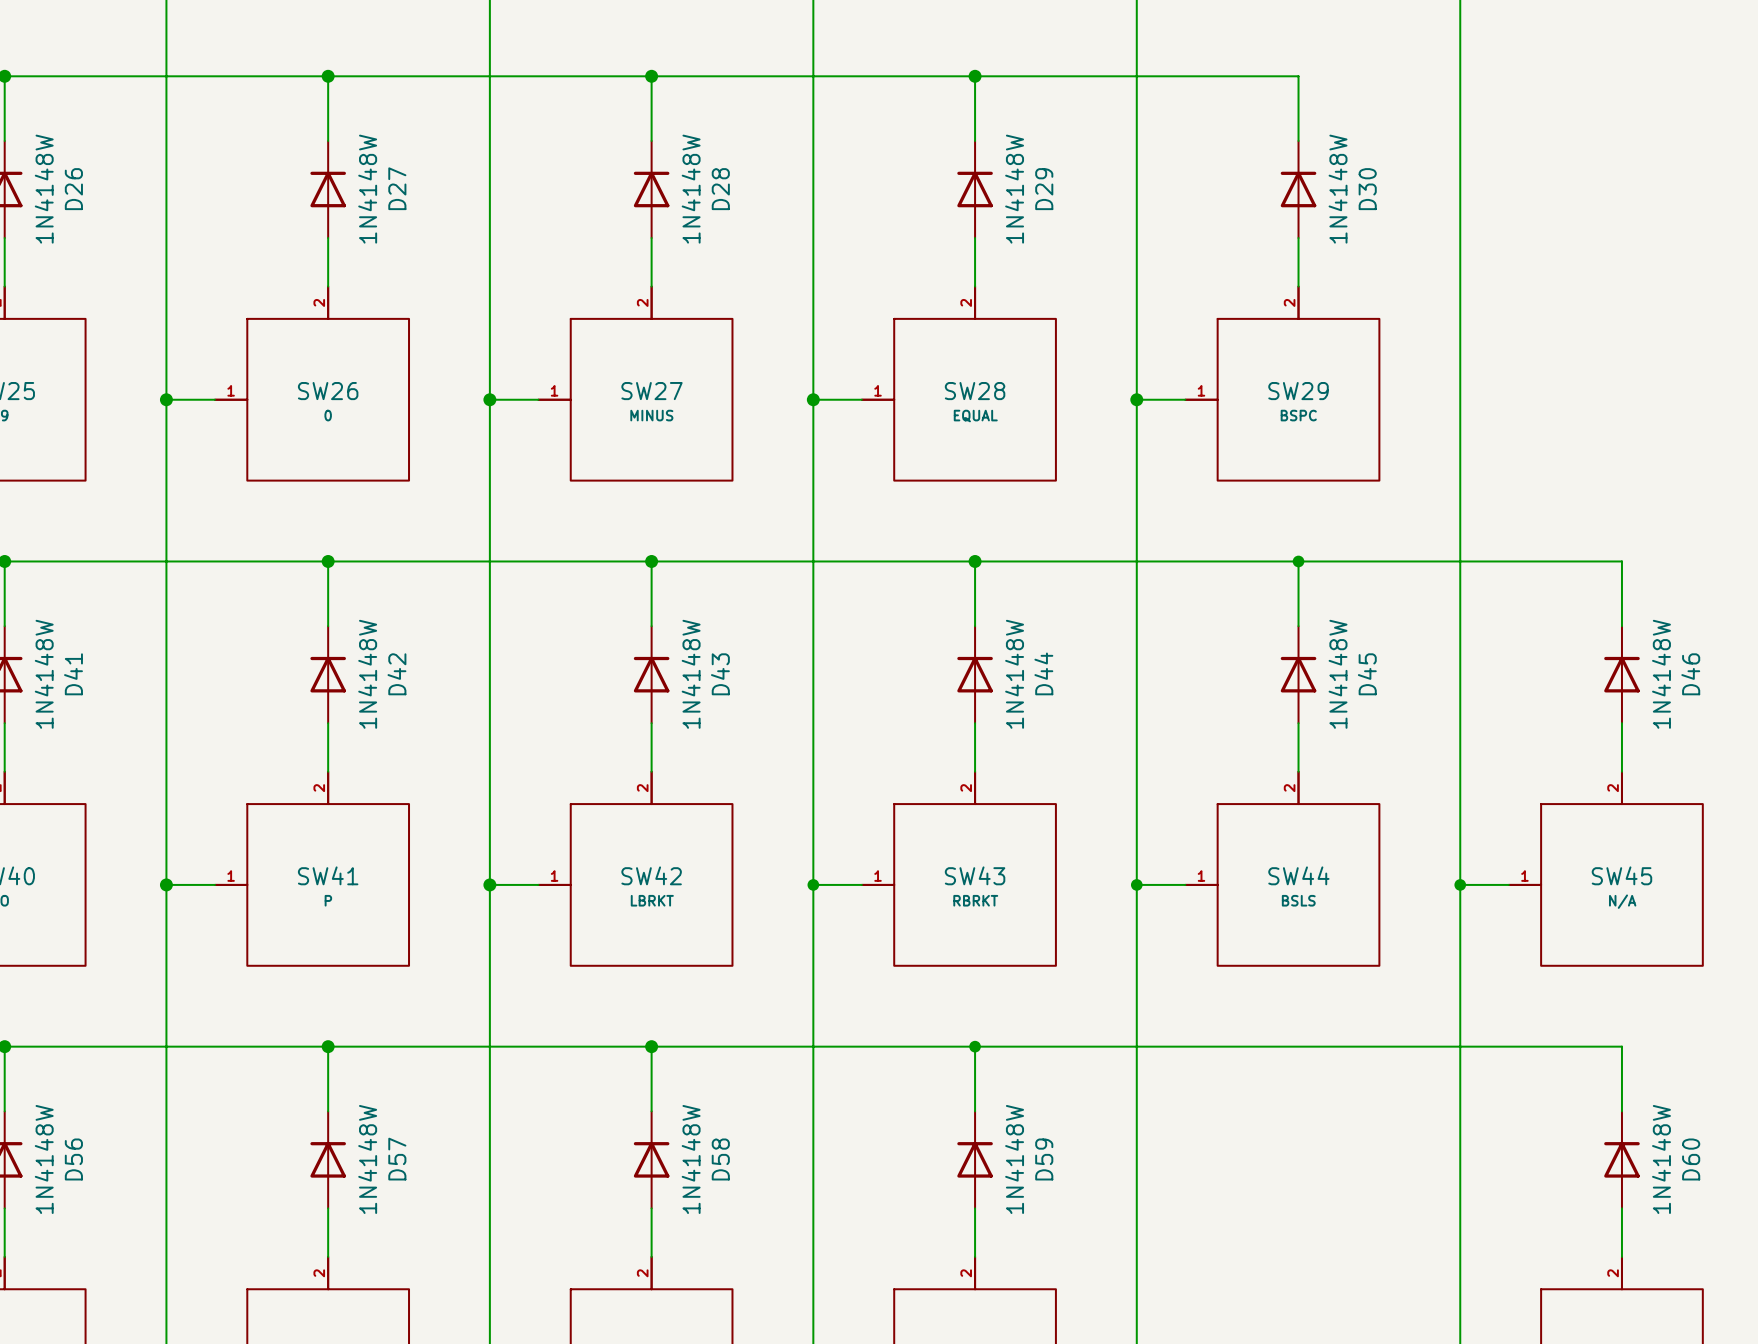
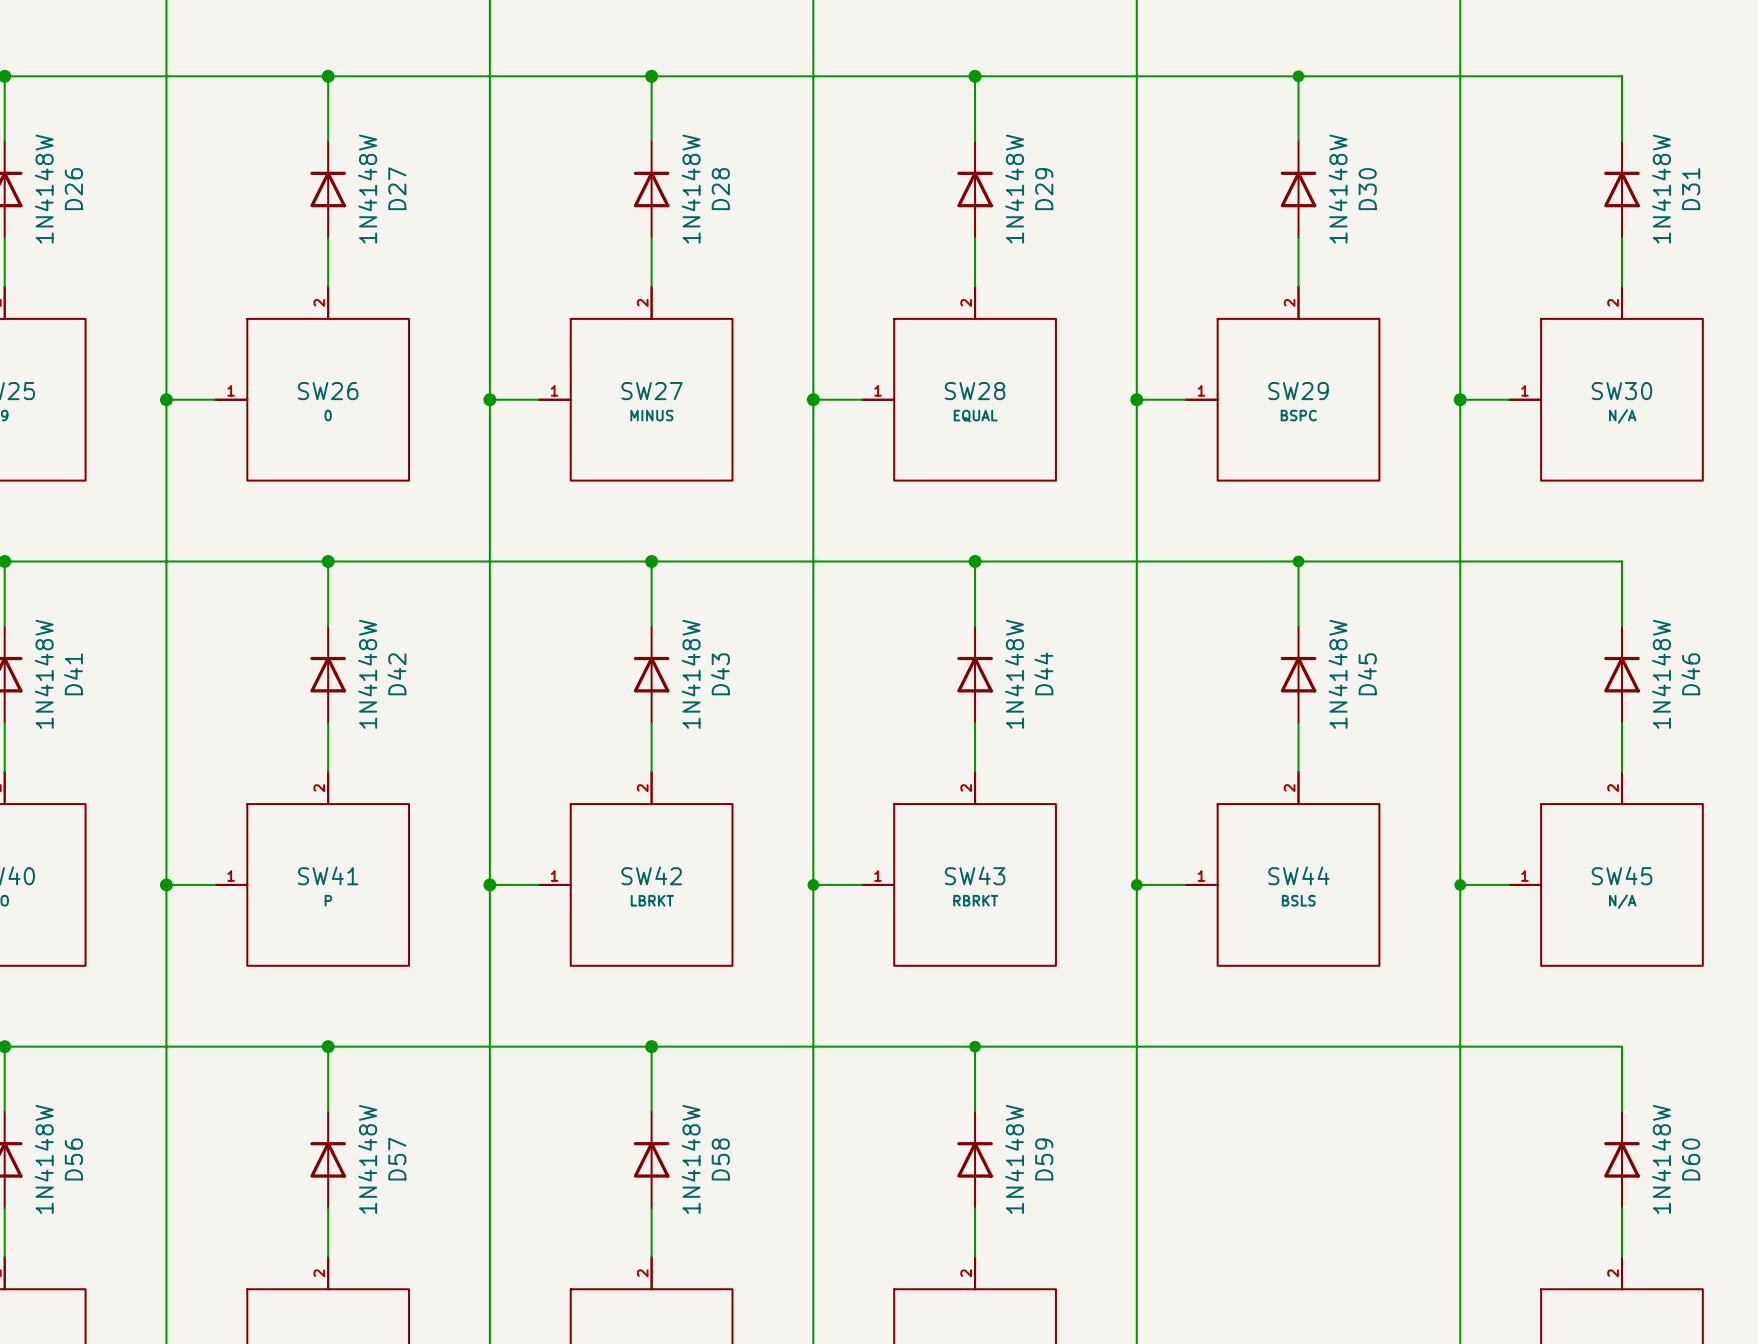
wire: none -> (1298, 76) (1621, 76) (1621, 140)
junction: none -> (1298, 76)
D31: none -> 1N4148W (1621, 189)
wire: none -> (1621, 238) (1621, 286)
SW30: none -> (1605, 383)
wire: none -> (1460, 399) (1508, 399)
junction: none -> (1460, 399)

